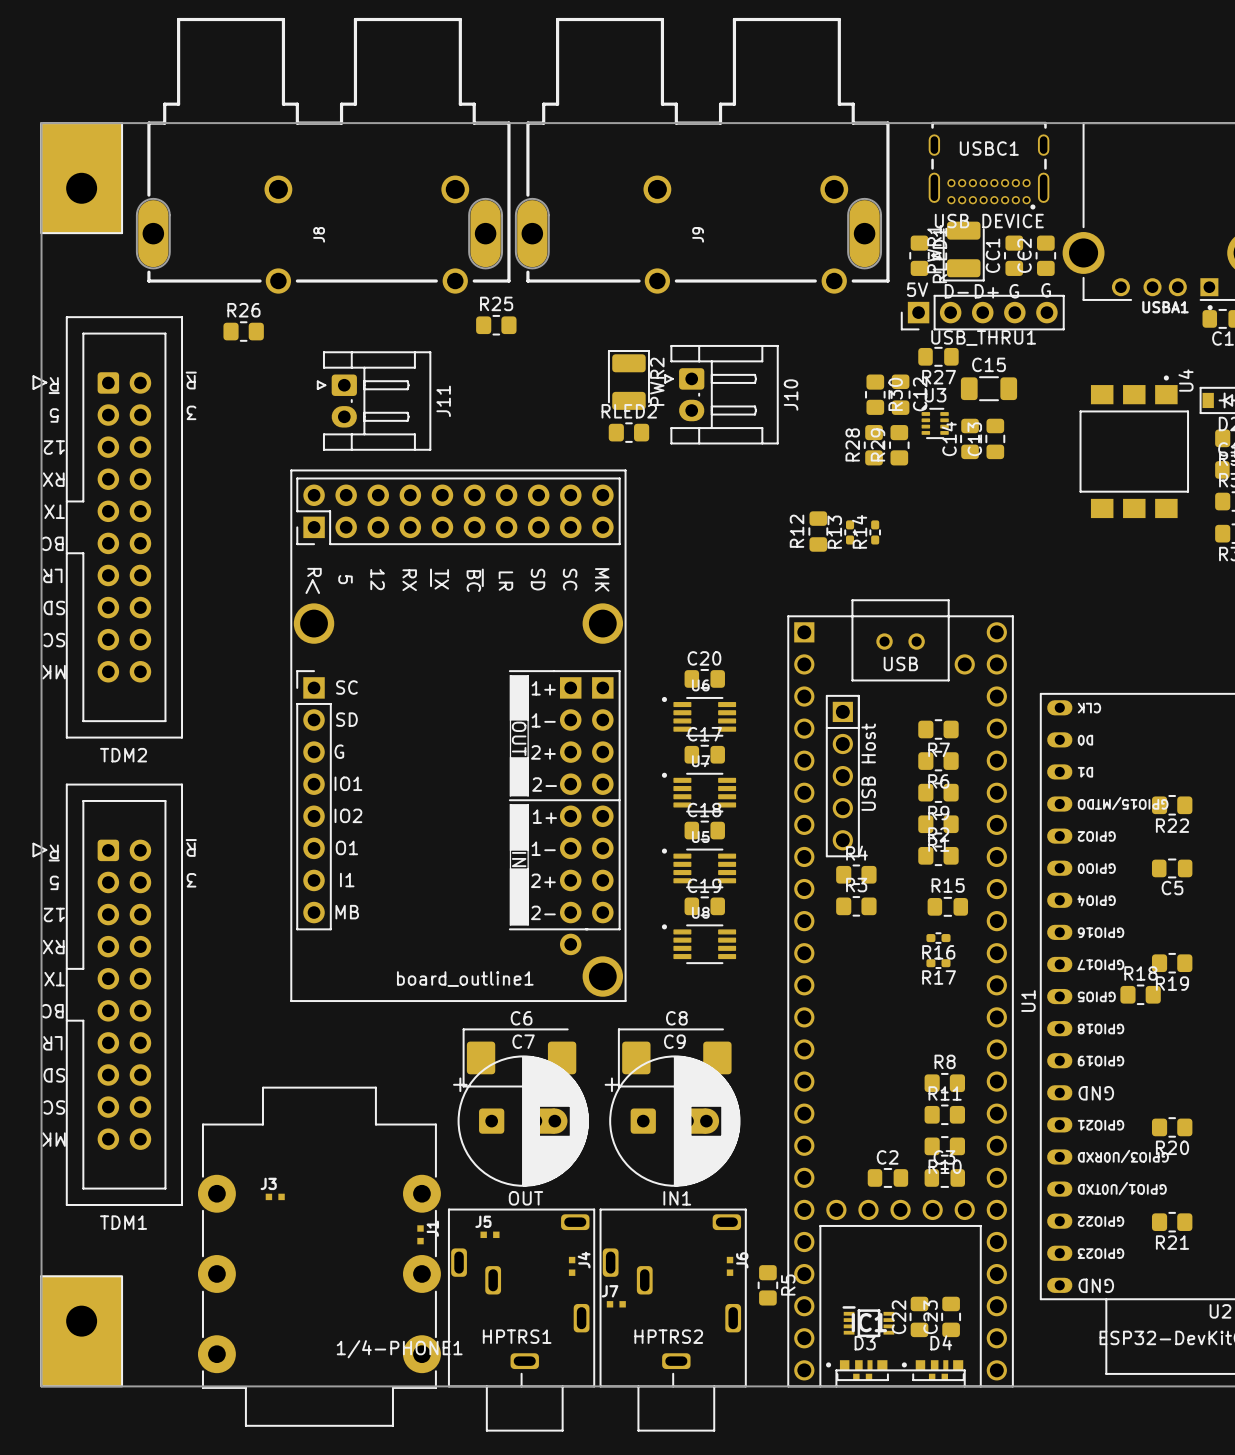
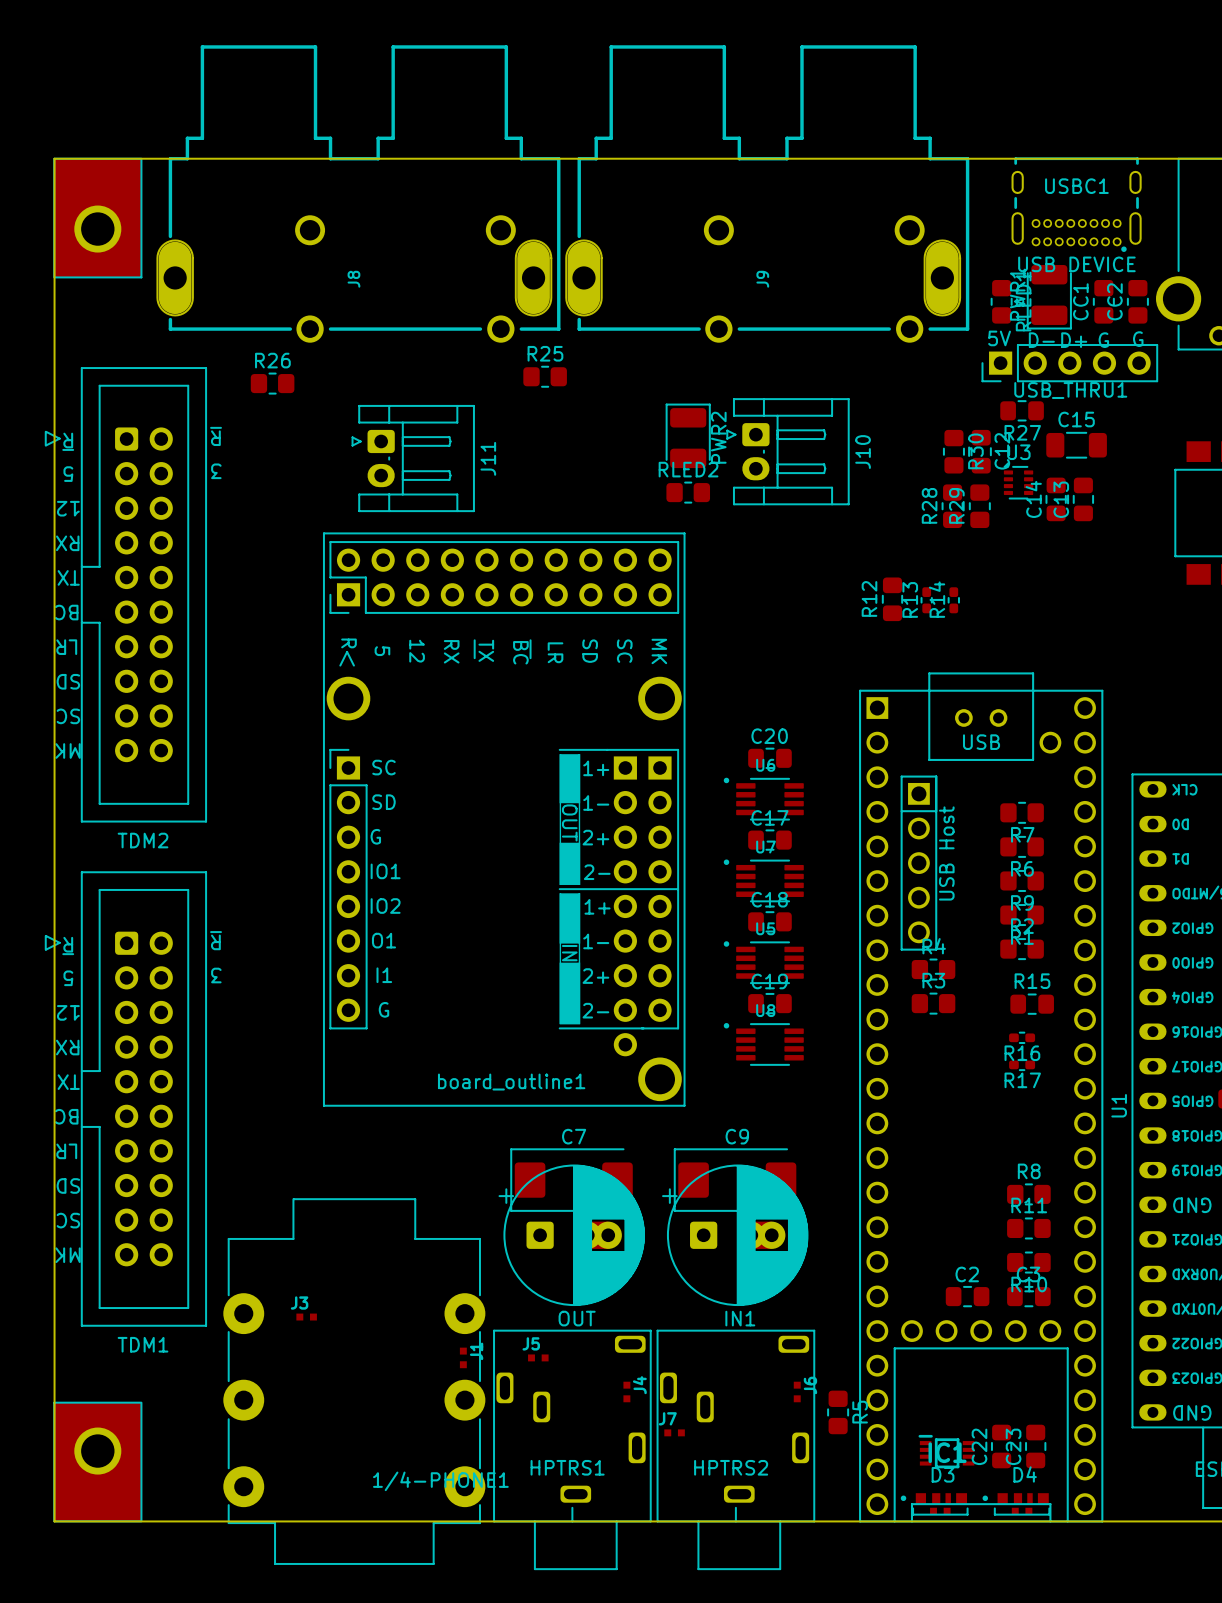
board_outline1 text: MB (347, 912) -> G (383, 1009)
C7 footprint: [453, 1055, 589, 1187] -> [498, 1148, 645, 1306]
C9 footprint: [604, 1055, 741, 1187] -> [662, 1148, 809, 1306]
C6: (519, 1057) -> none
C8: (674, 1057) -> none

